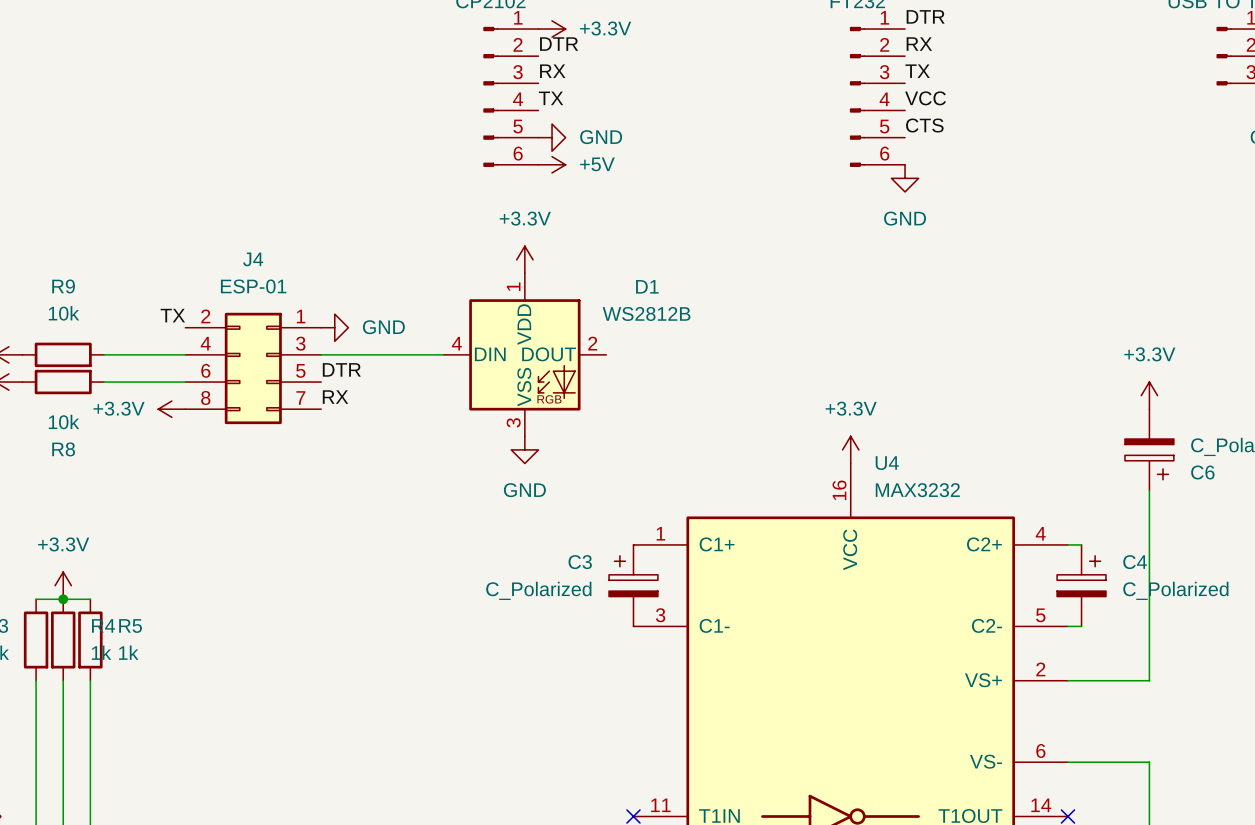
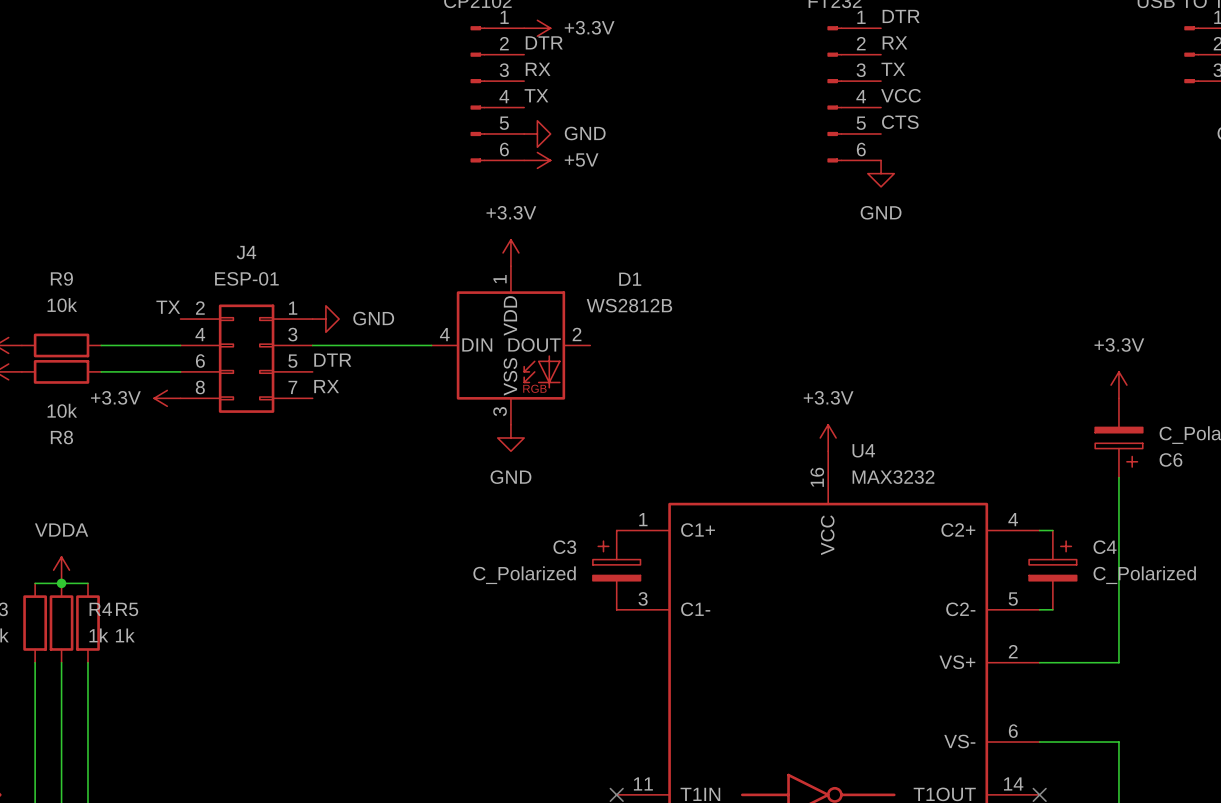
power symbol: +3.3V (63, 585) -> VDDA (61, 570)

